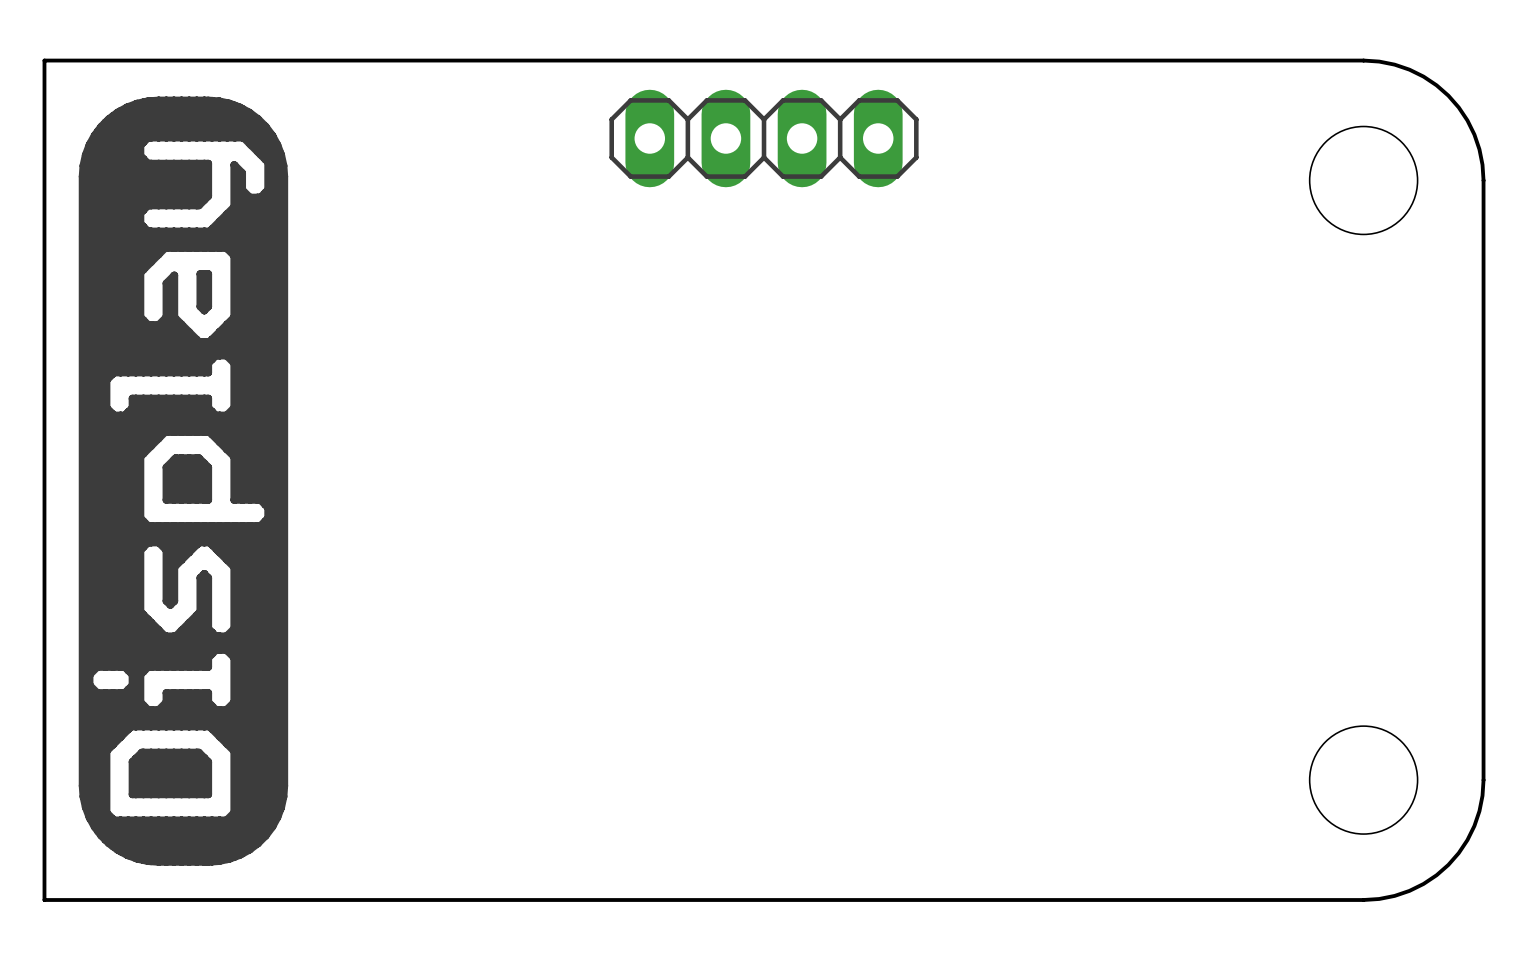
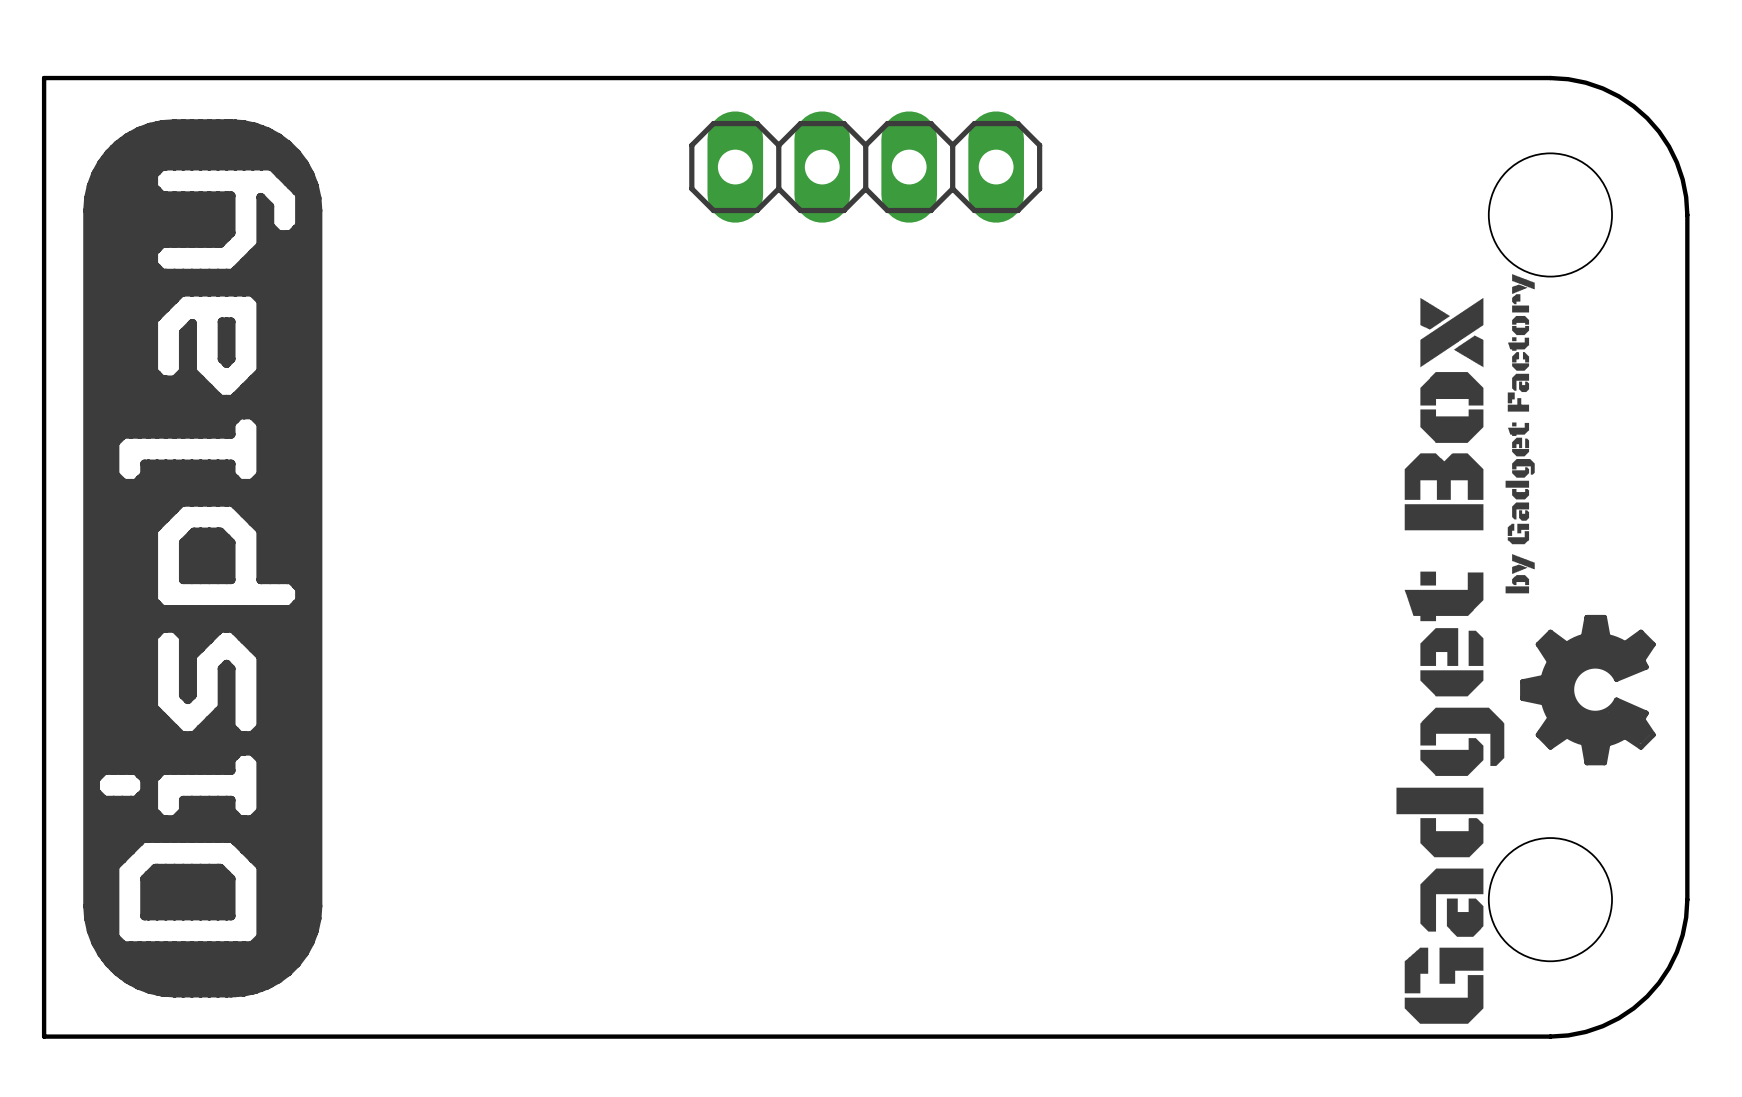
drawing: none -> [1396, 274, 1656, 1024]

